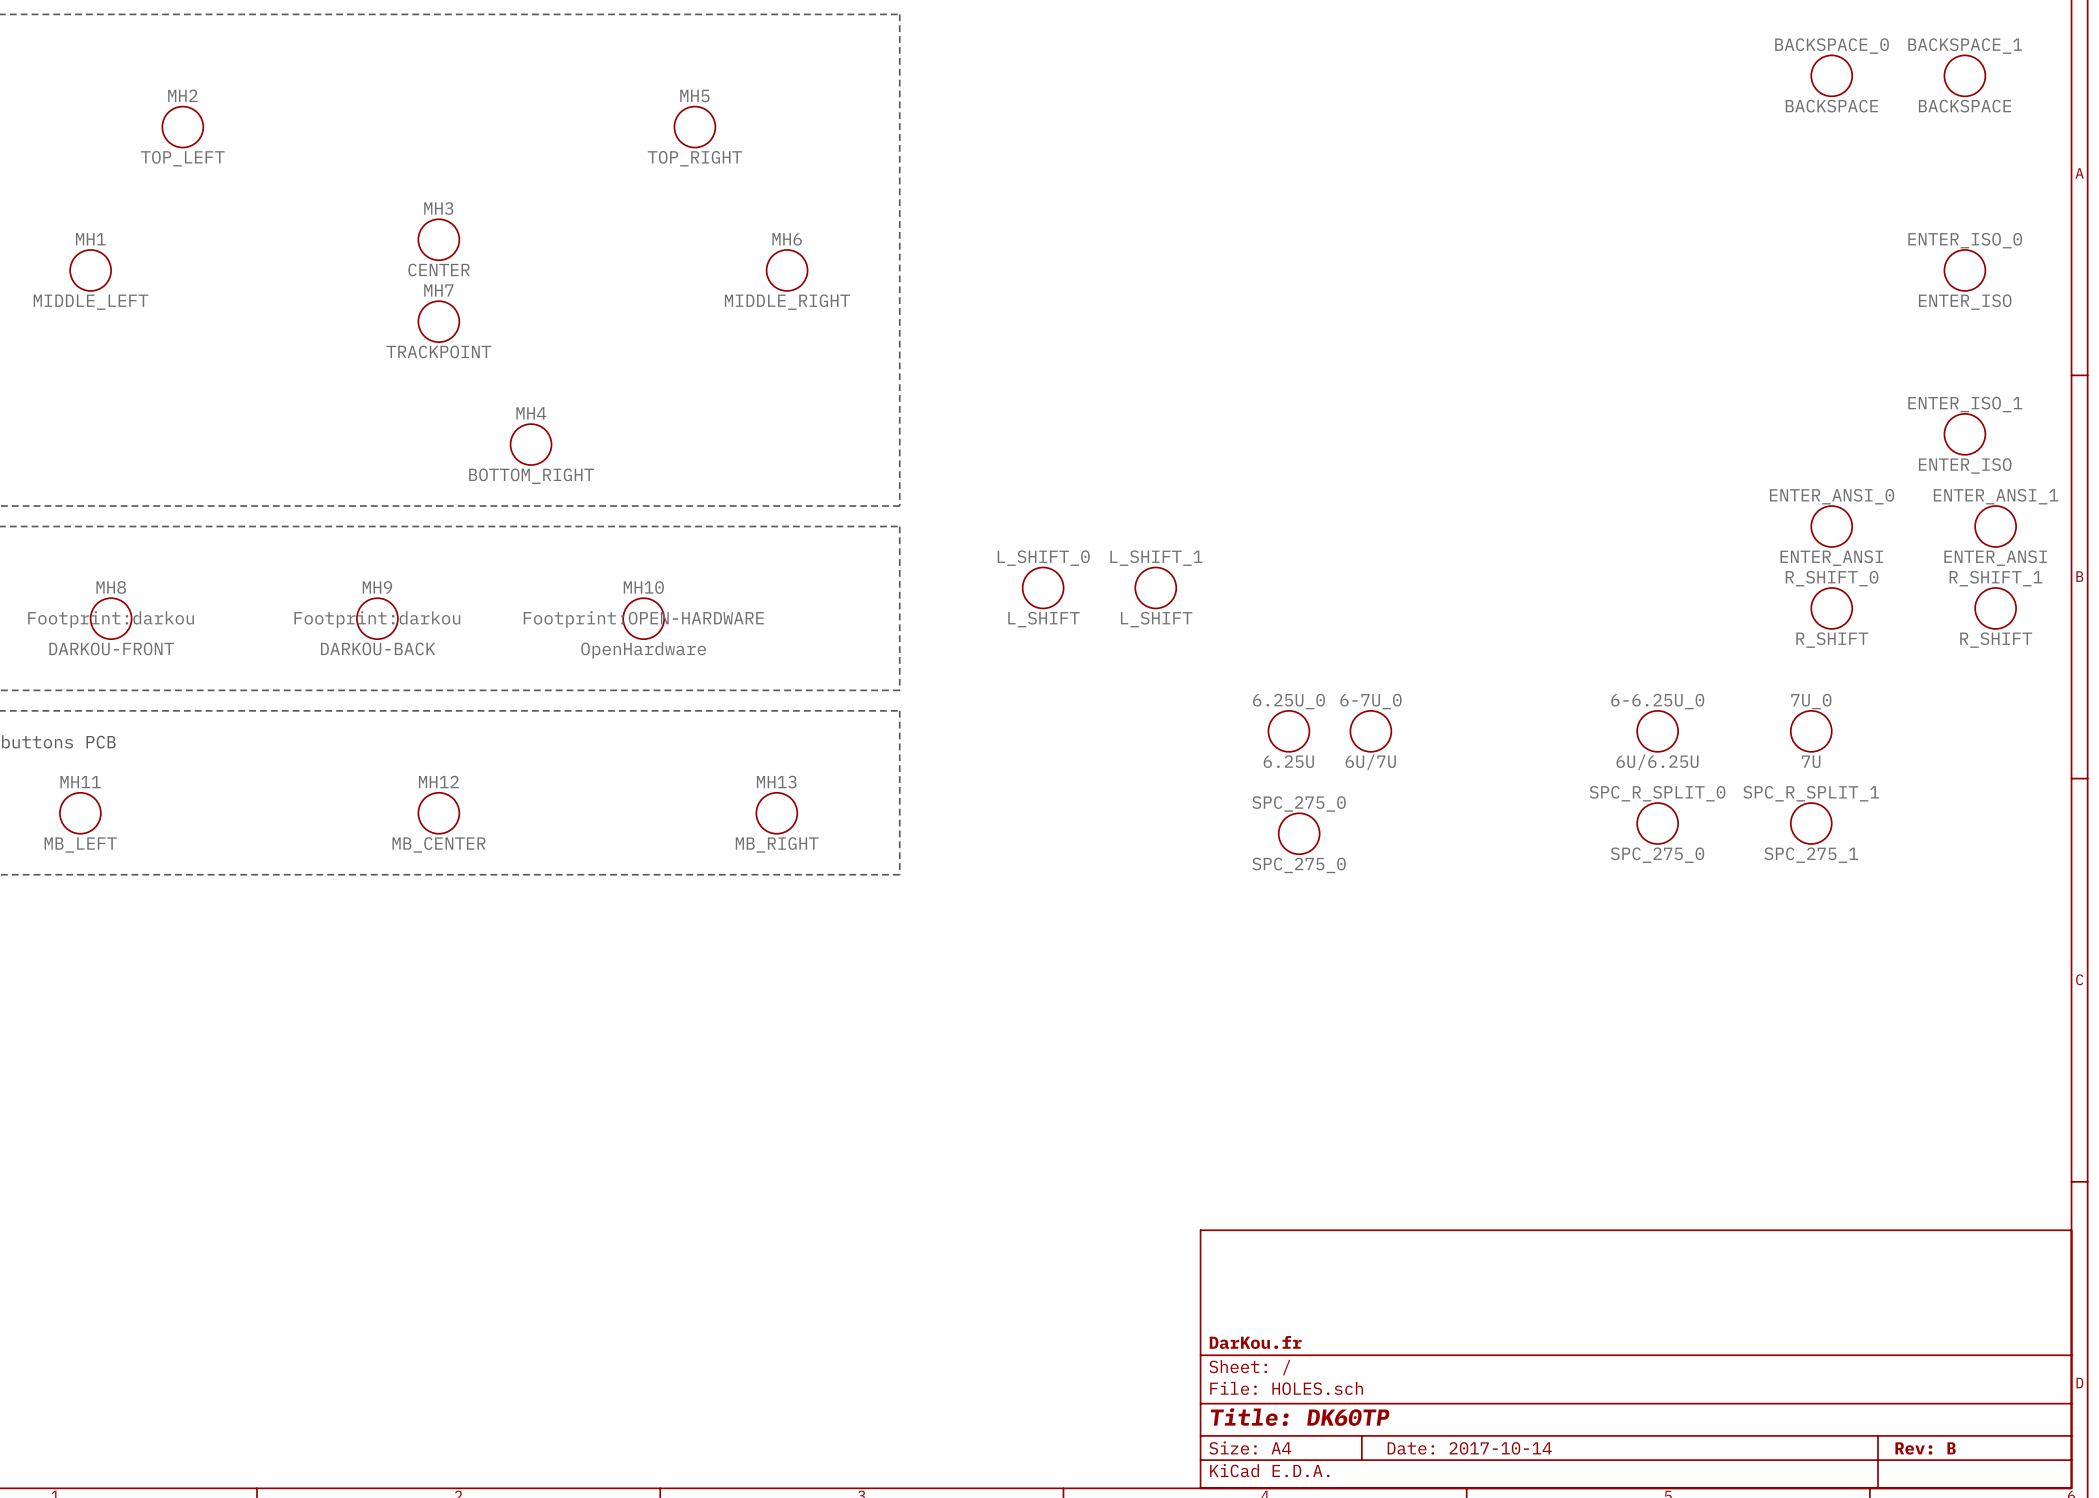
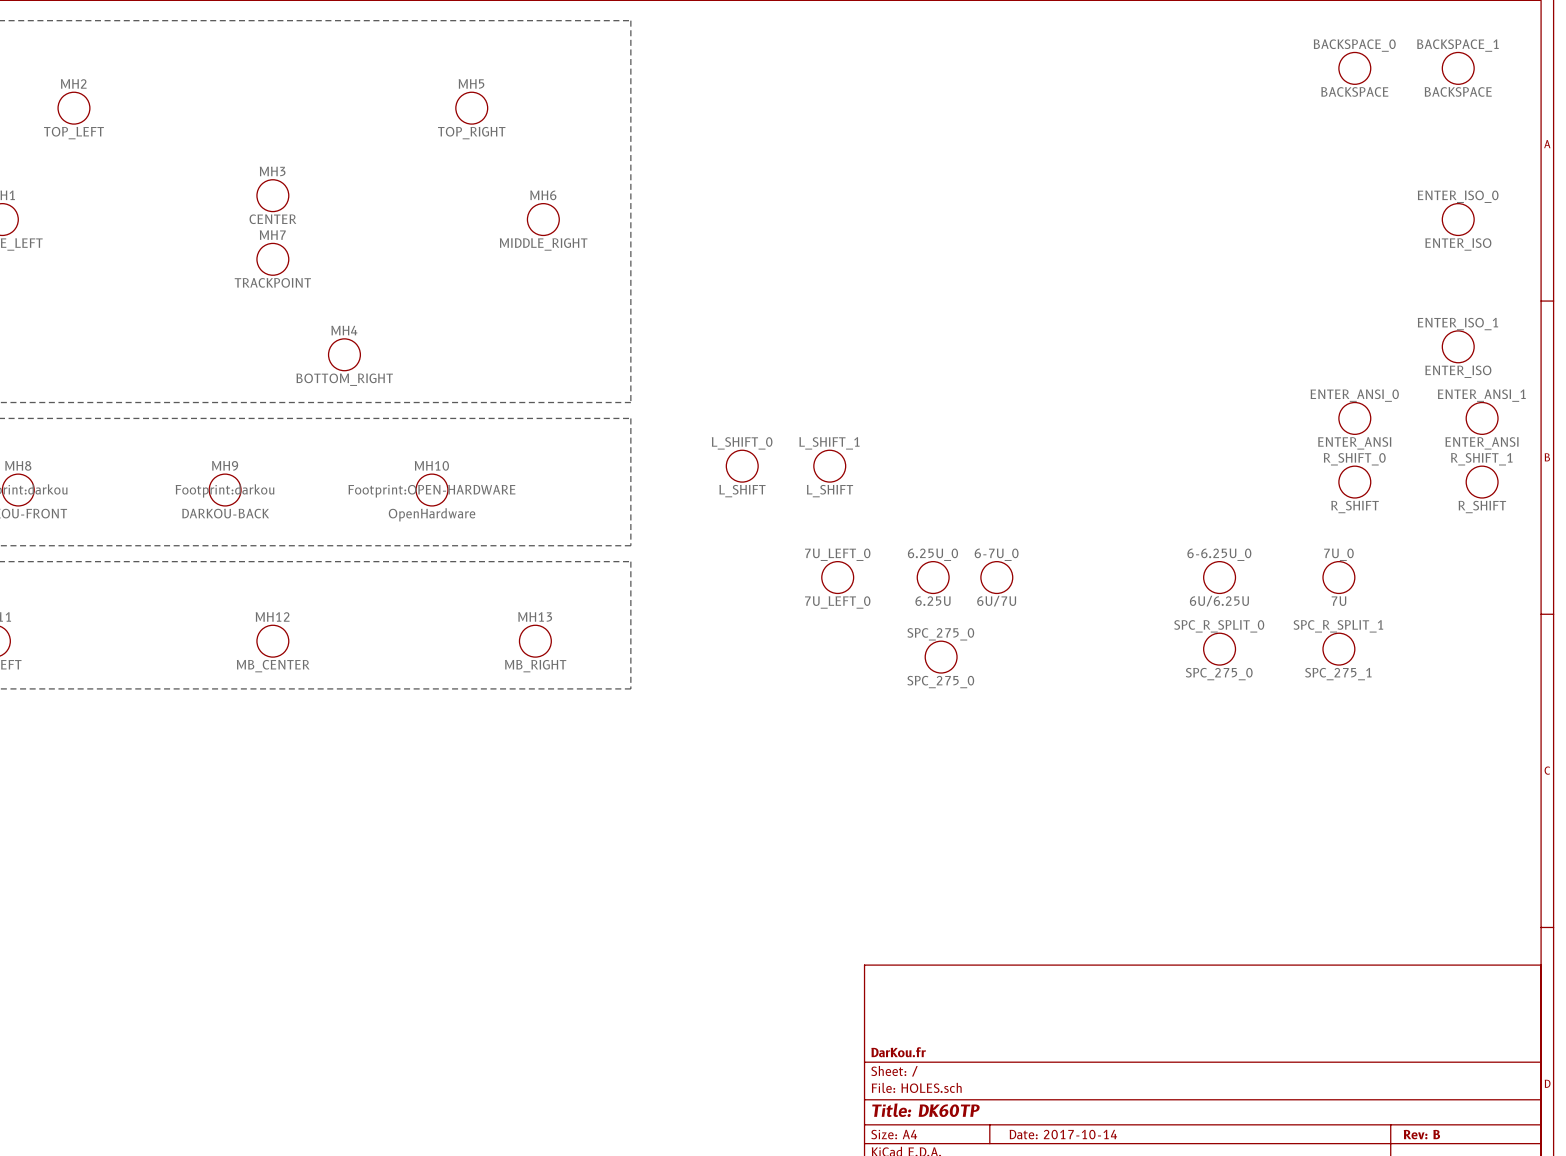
7U_LEFT_0: none -> 7U_LEFT_0 (837, 577)

